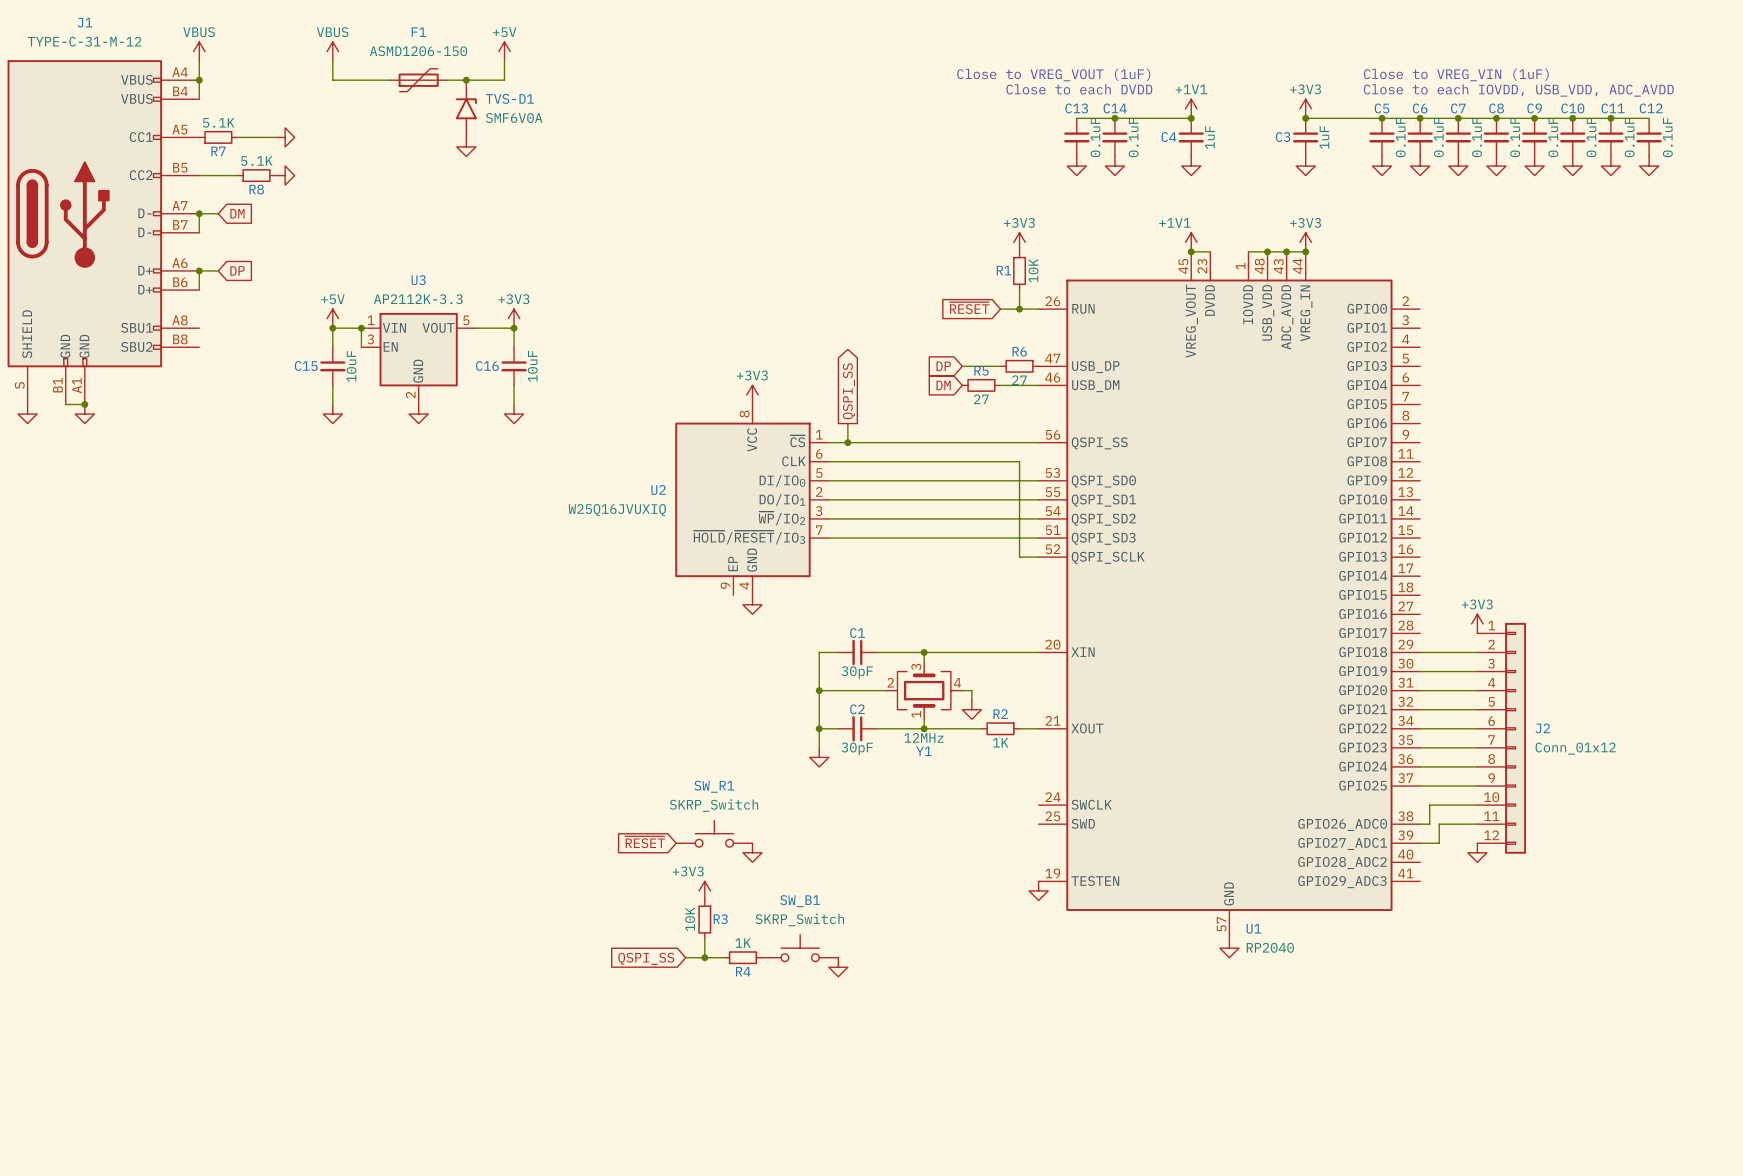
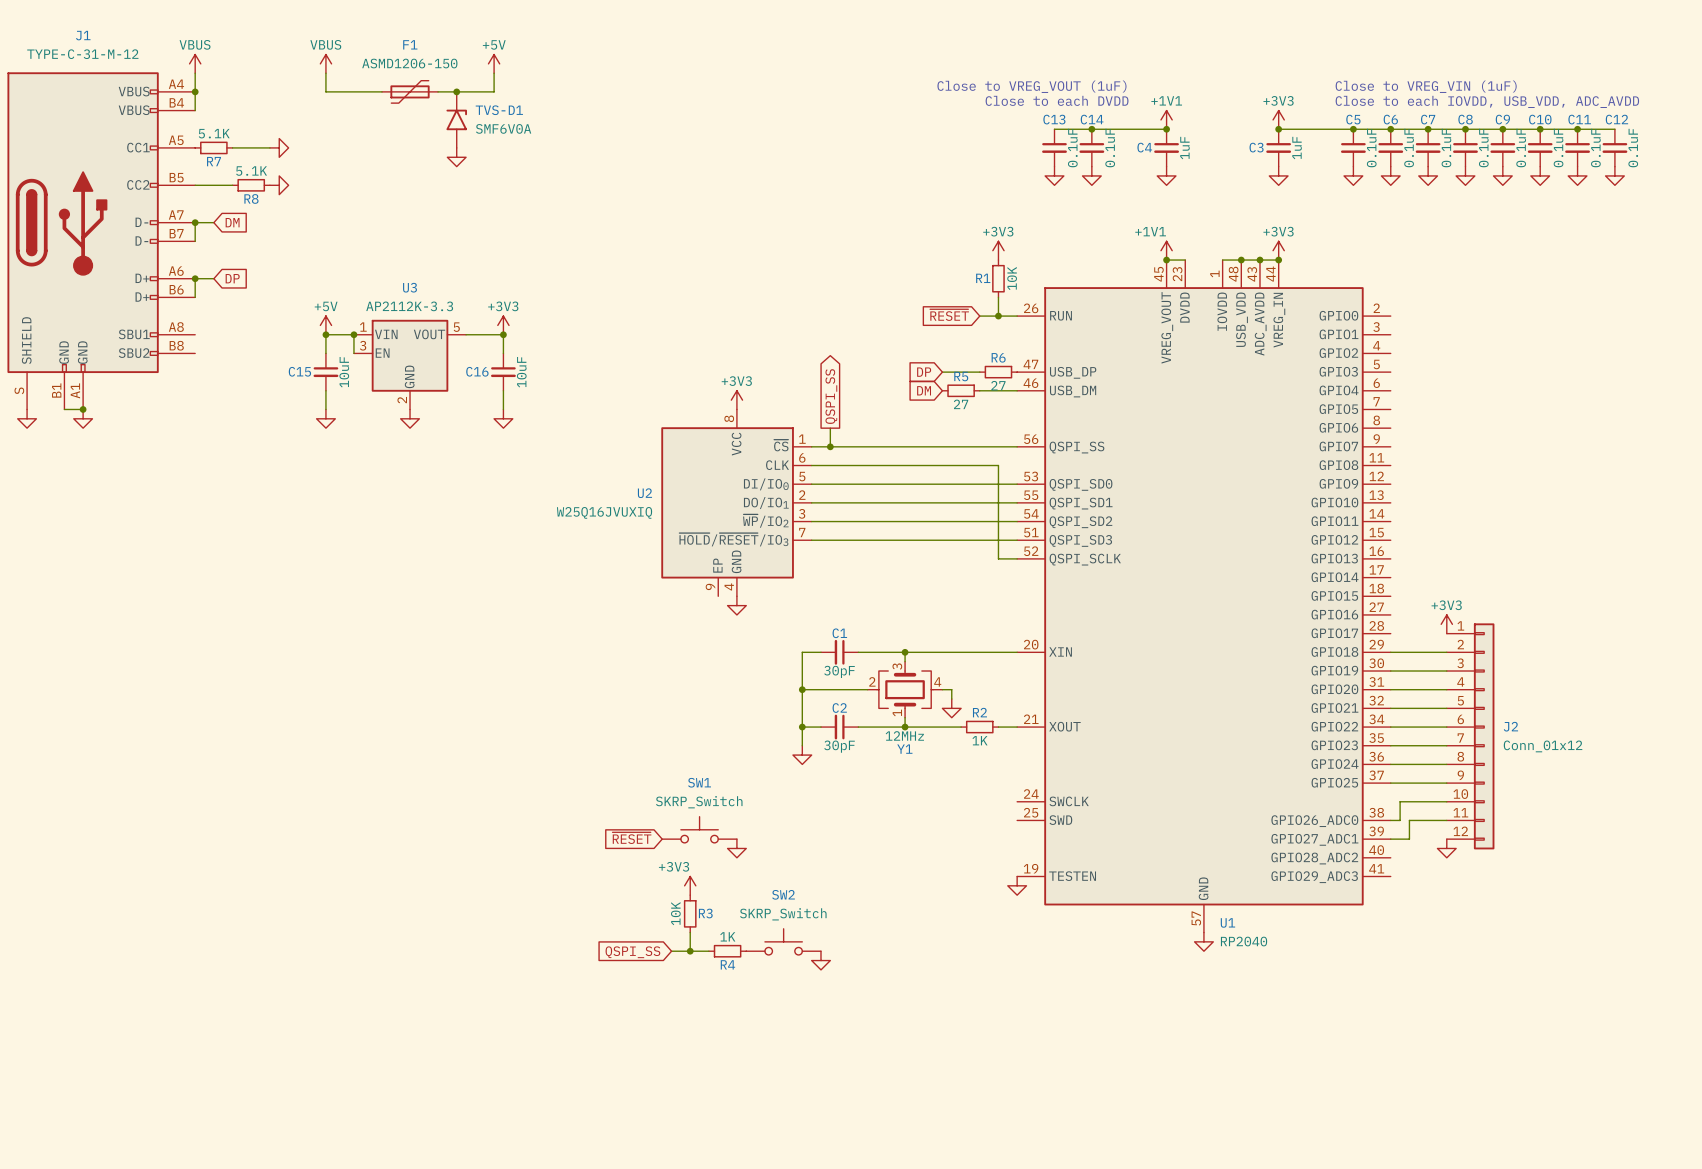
SW_R1 name: SW_R1 (714, 786) -> SW1 (699, 782)
SW_B1 name: SW_B1 (800, 901) -> SW2 (783, 894)

